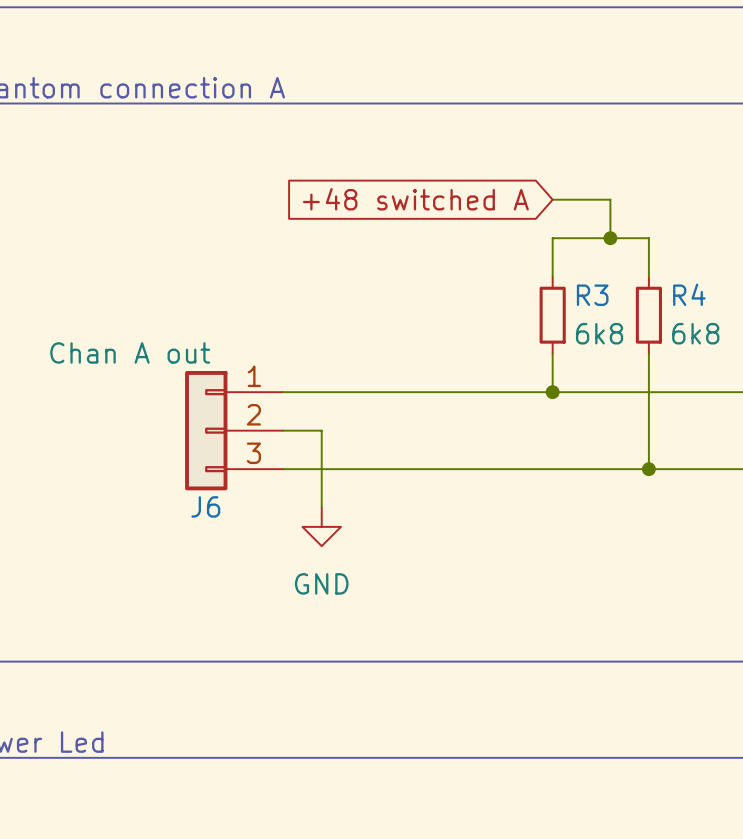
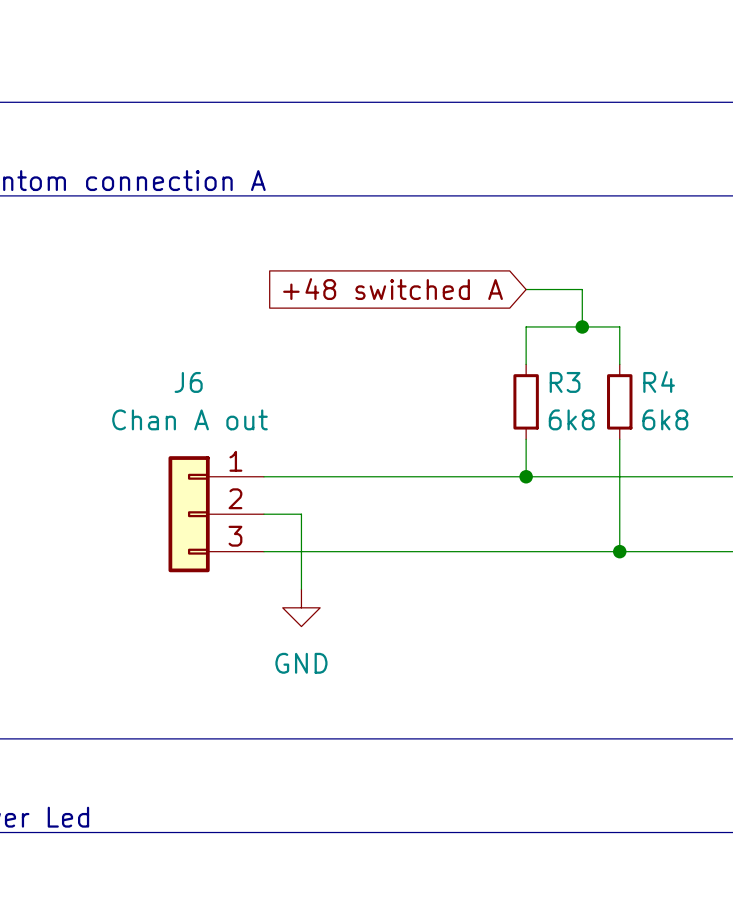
J6 value: none -> Chan A out (189, 419)
J6 text: Chan A out (130, 352) -> none
J6 name position: J6 (205, 506) -> J6 (188, 382)

